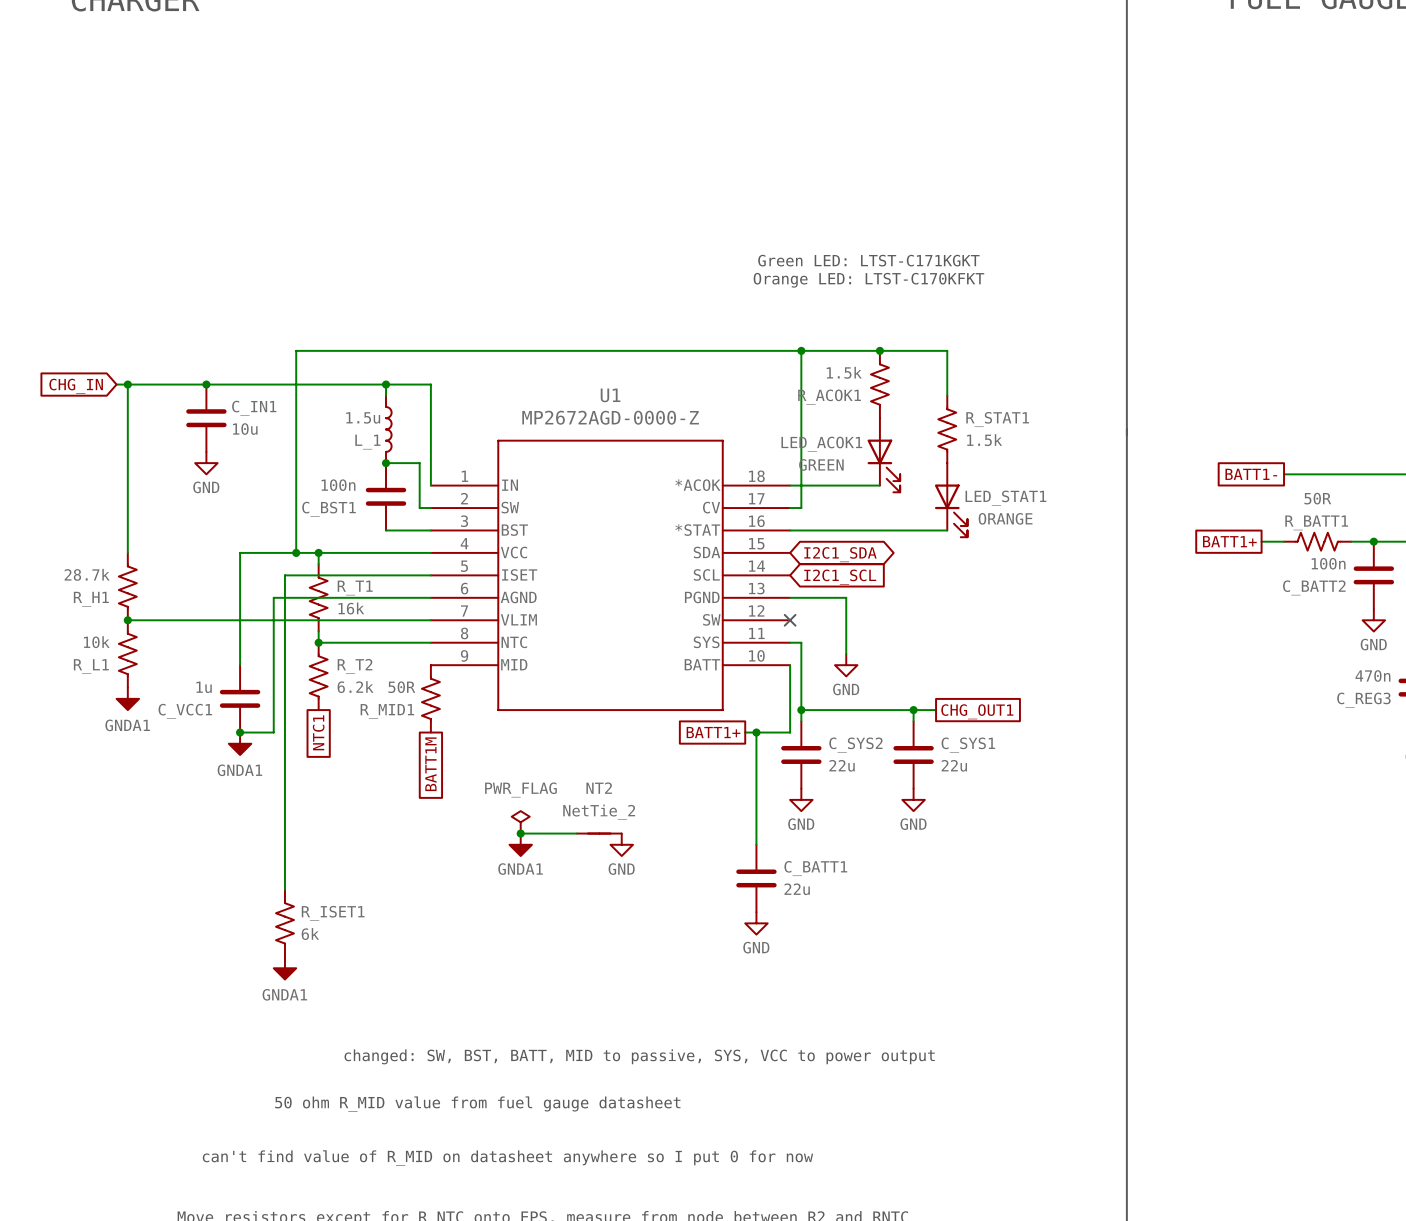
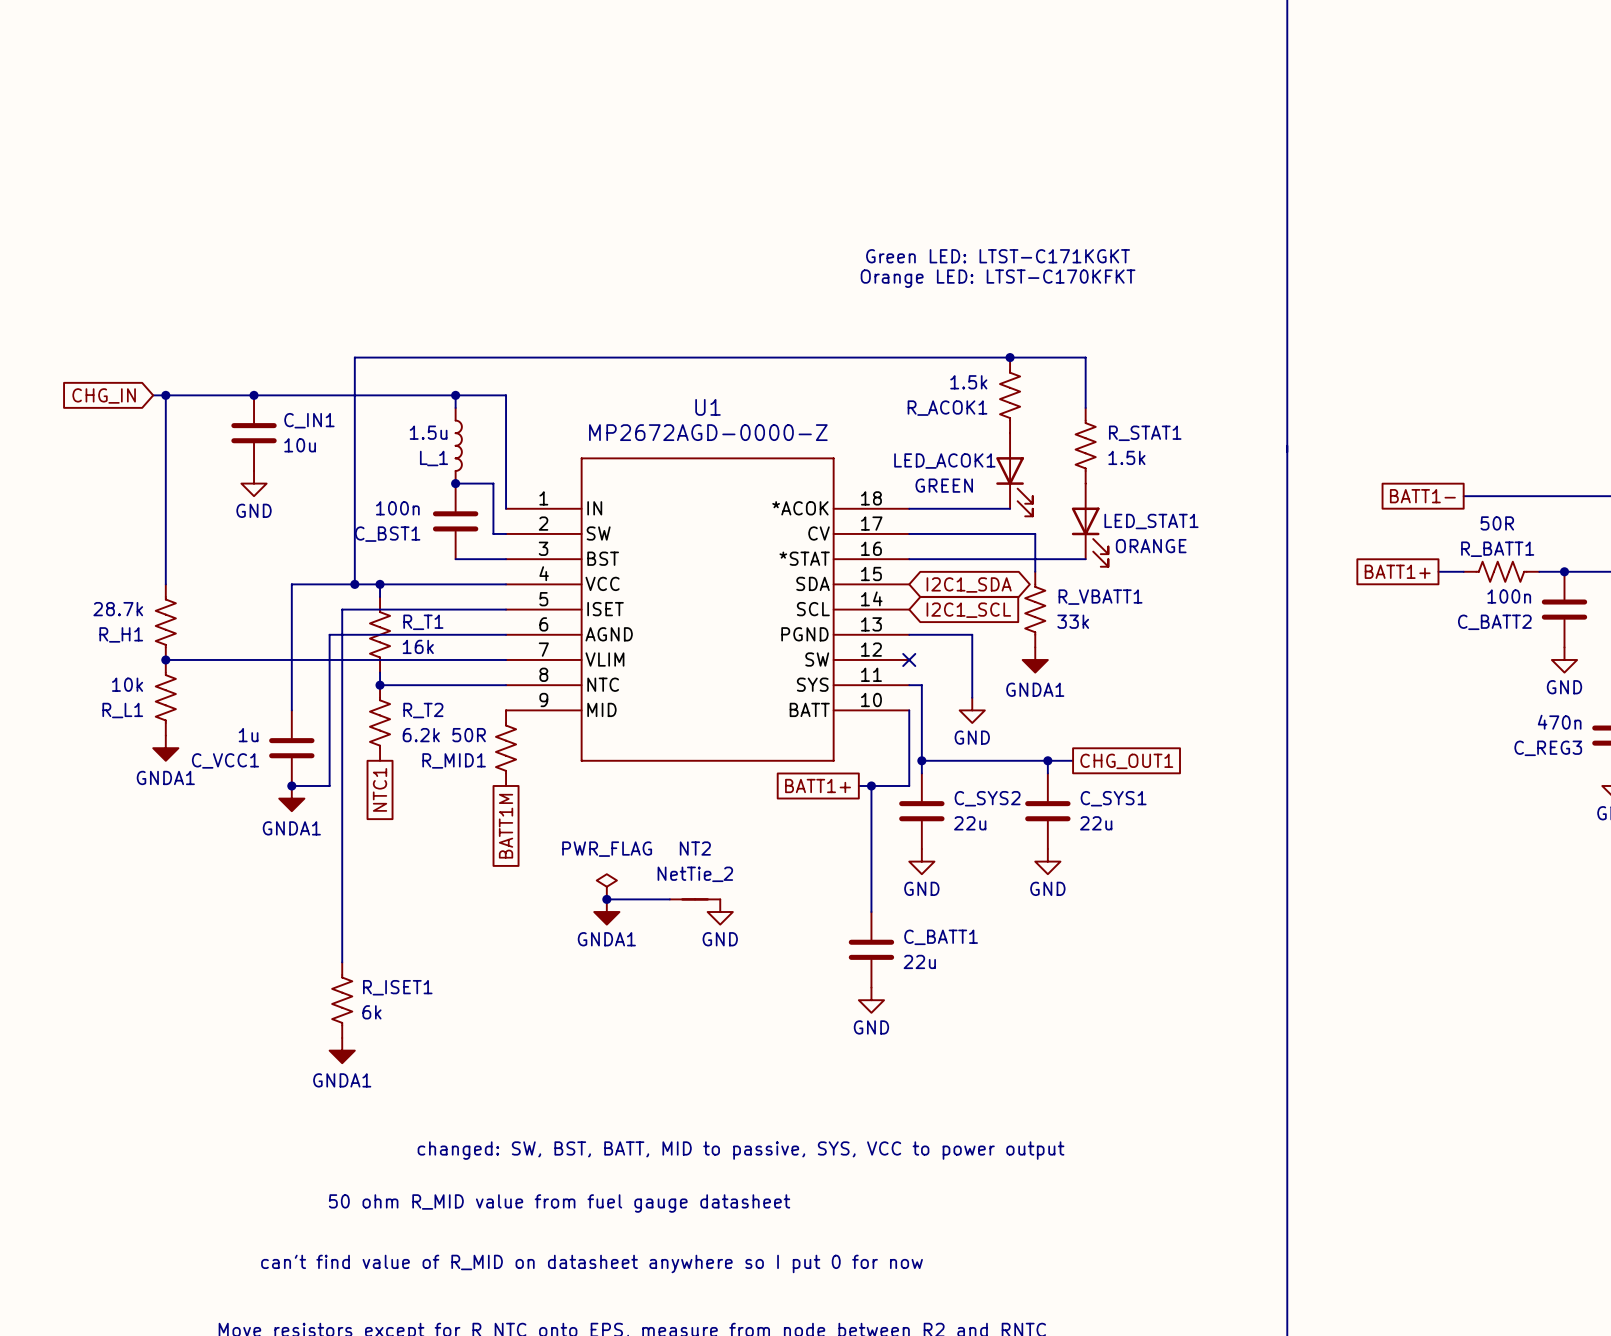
wire: (801, 350) (801, 508) -> (1035, 571) (1035, 533) (921, 533)
junction: (801, 350) -> none
R_VBATT1: none -> 33k (1035, 609)
power symbol: none -> GNDA1 (1035, 659)

